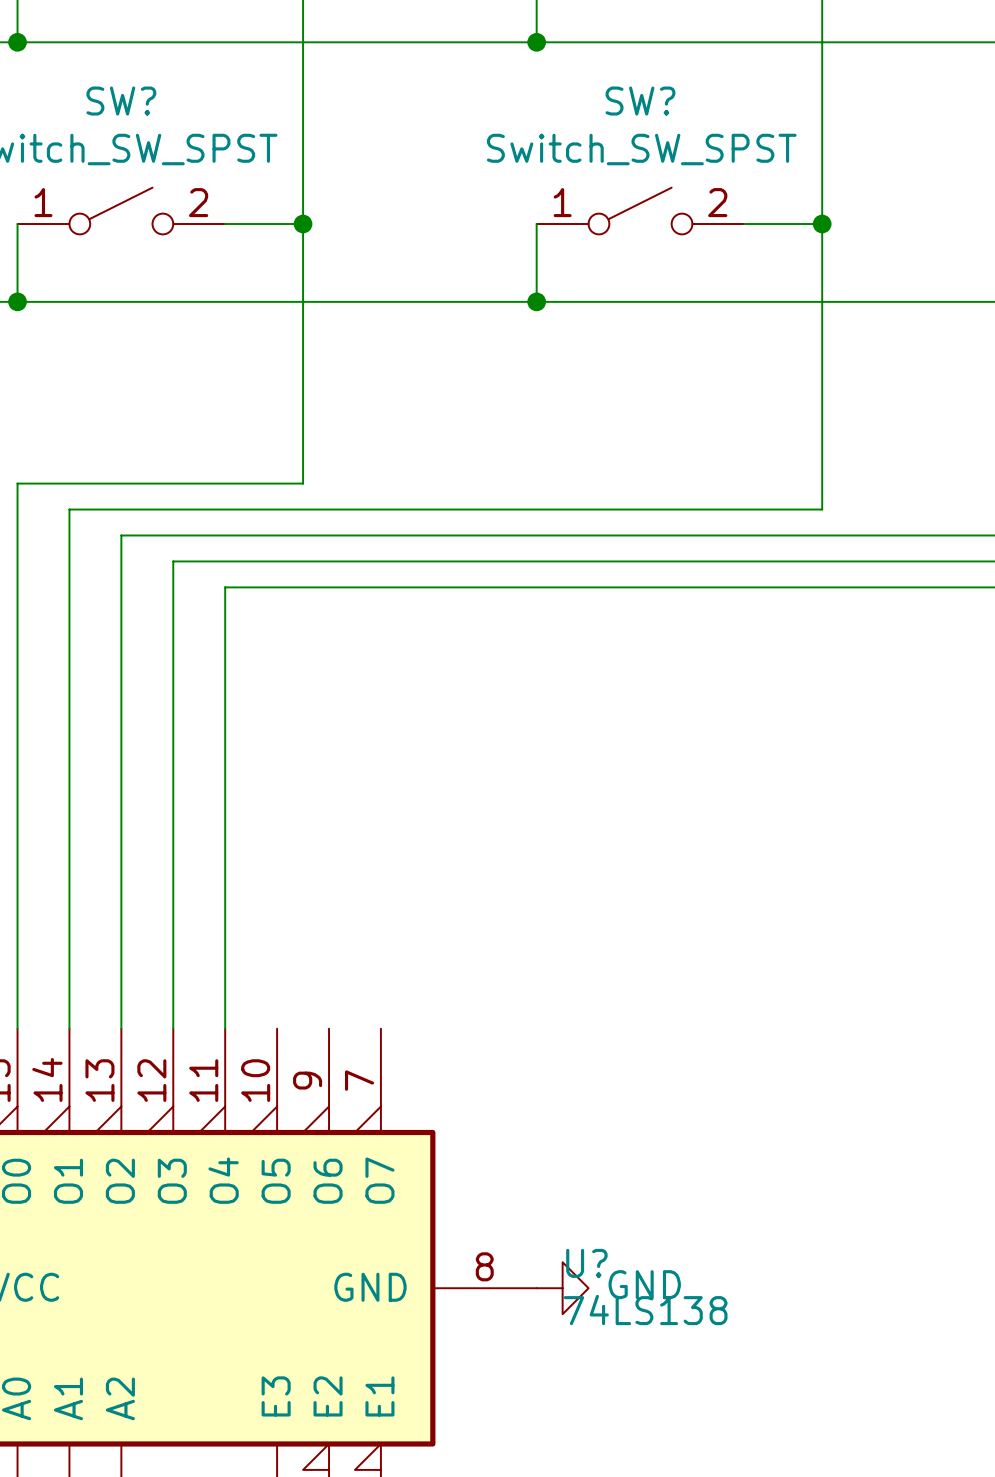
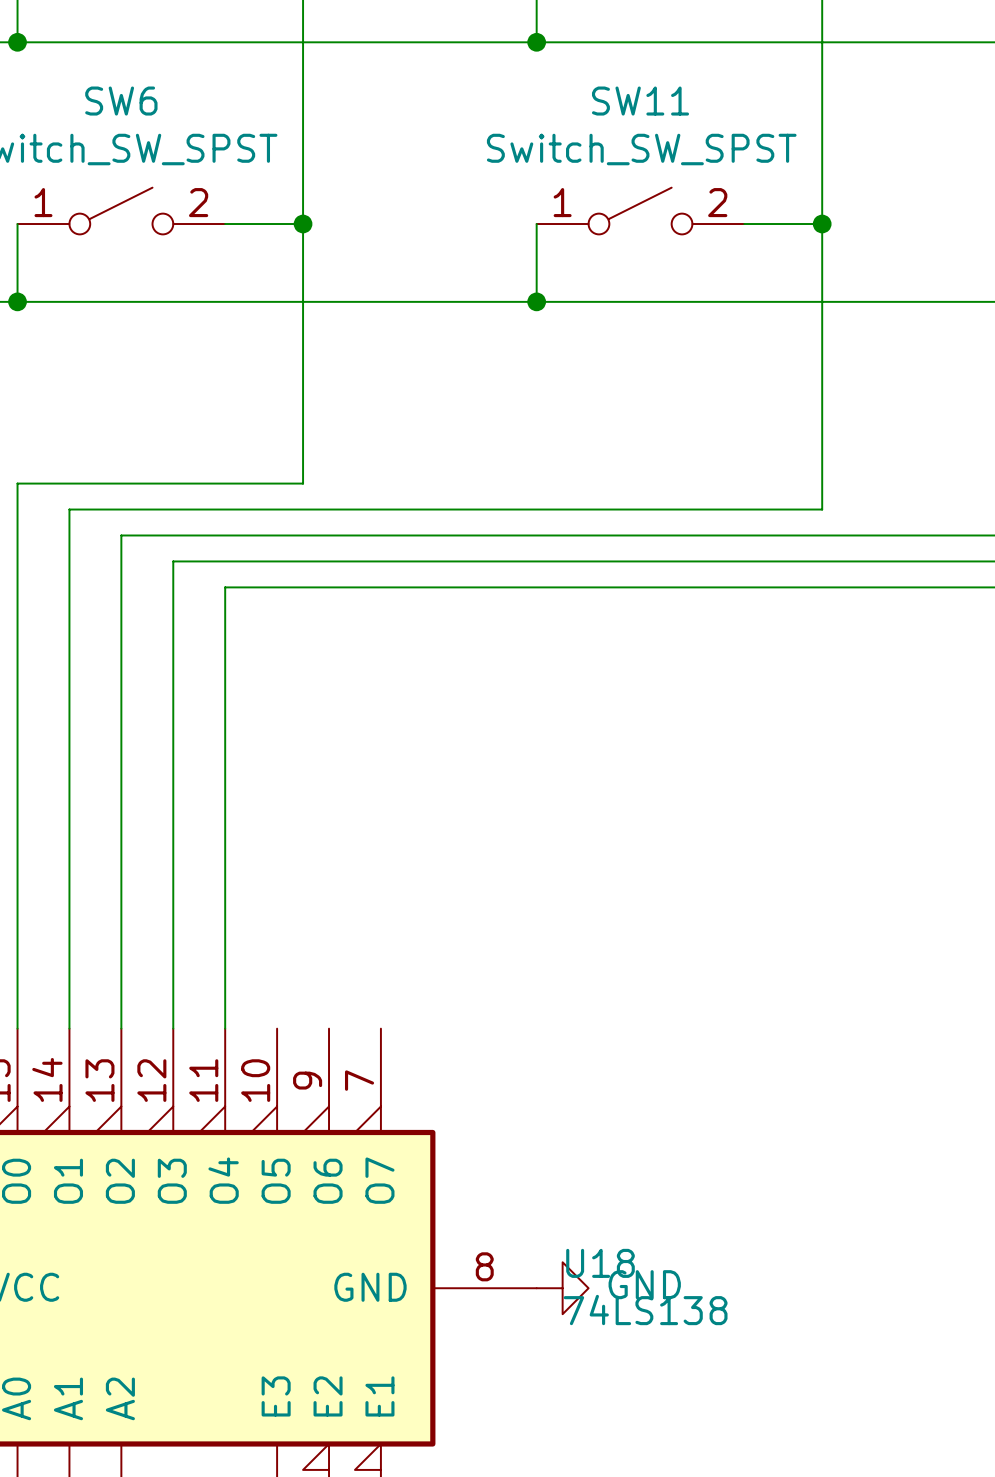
SW? name: SW? (121, 101) -> SW6 (121, 101)
SW? name: SW? (640, 101) -> SW11 (640, 101)
U? name: U? (586, 1263) -> U18 (600, 1263)

